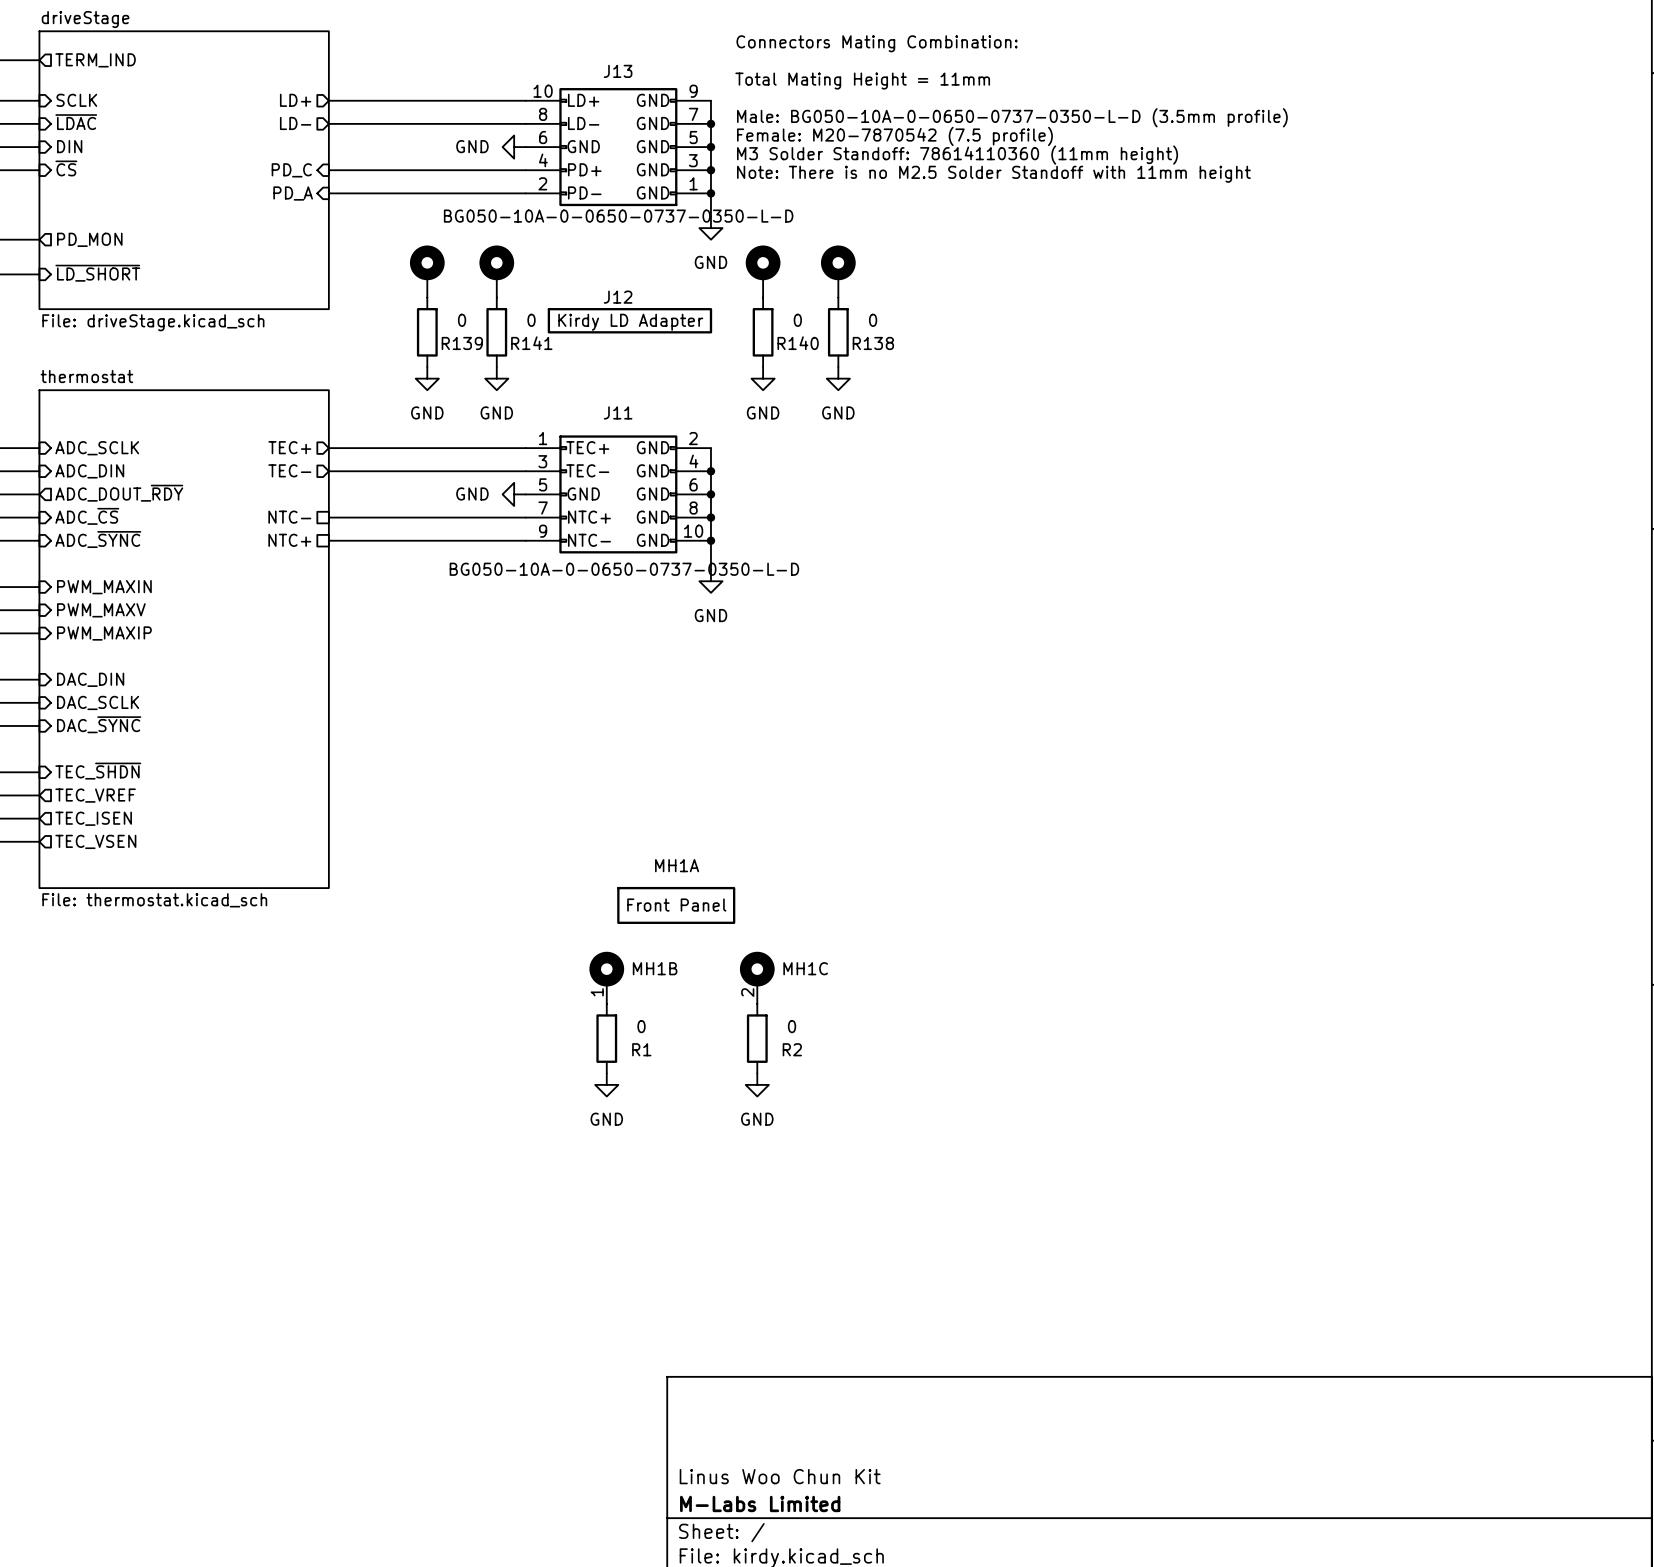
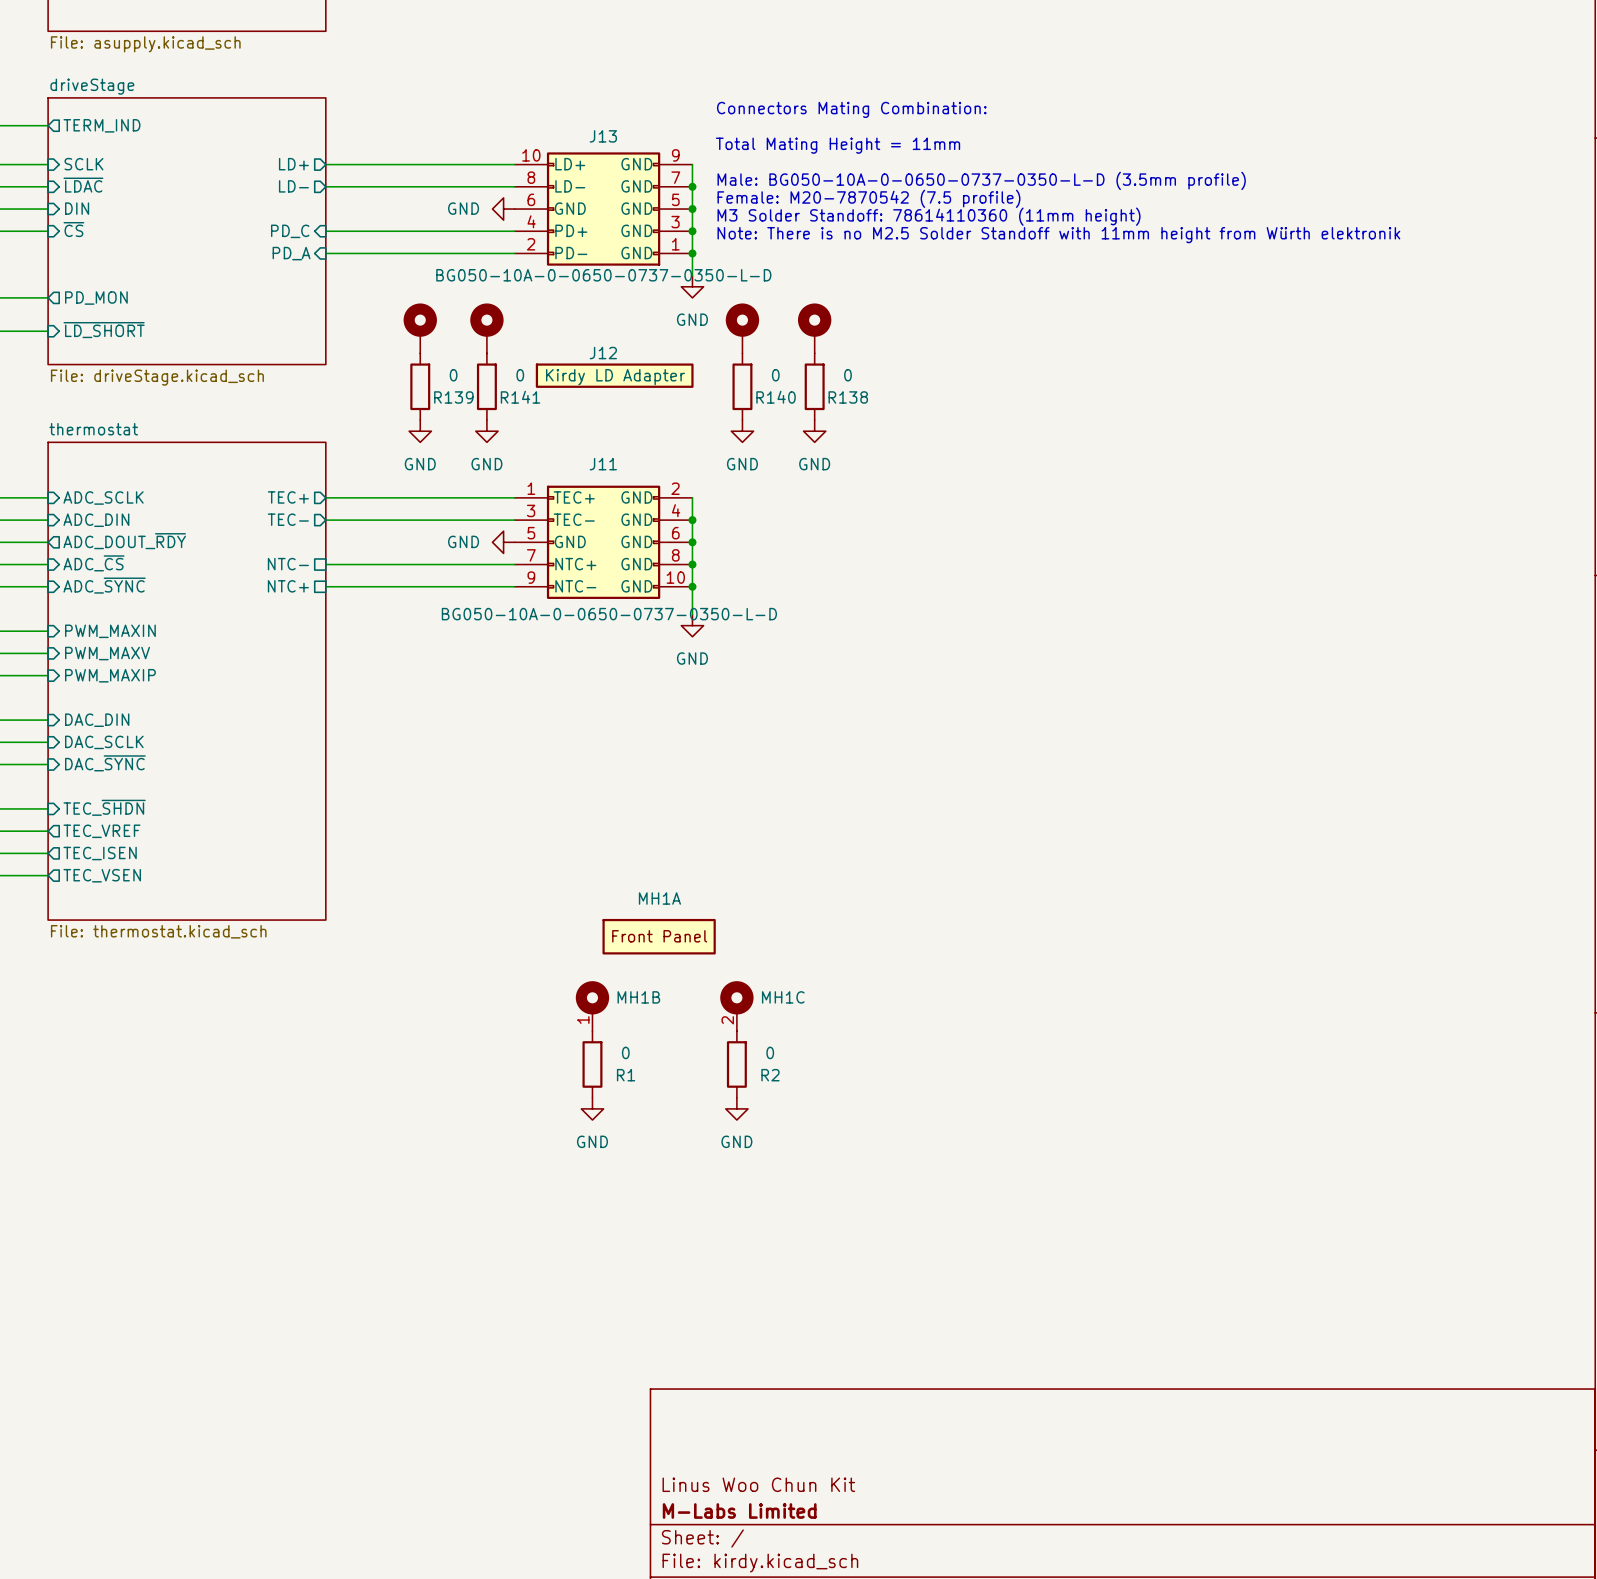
text: Note: There is no M2.5 Solder Standoff with 11mm height (993, 174) -> Note: There is no M2.5 Solder Standoff with 11mm height from Würth elektronik (1058, 235)

